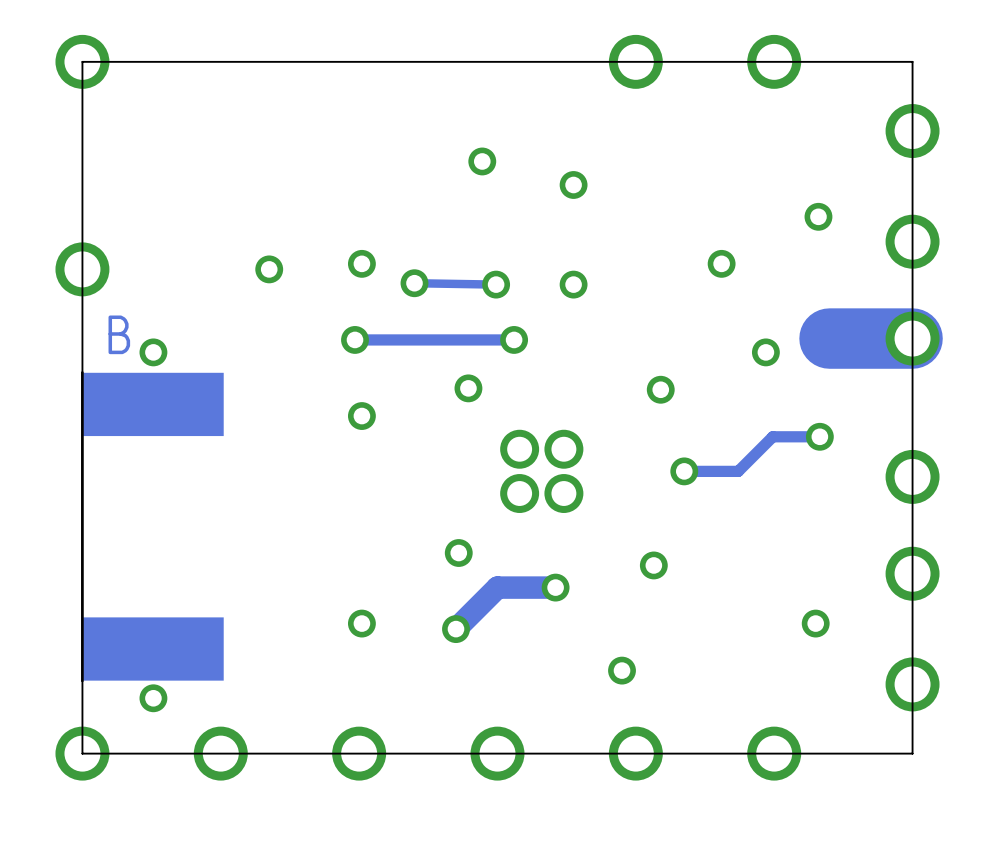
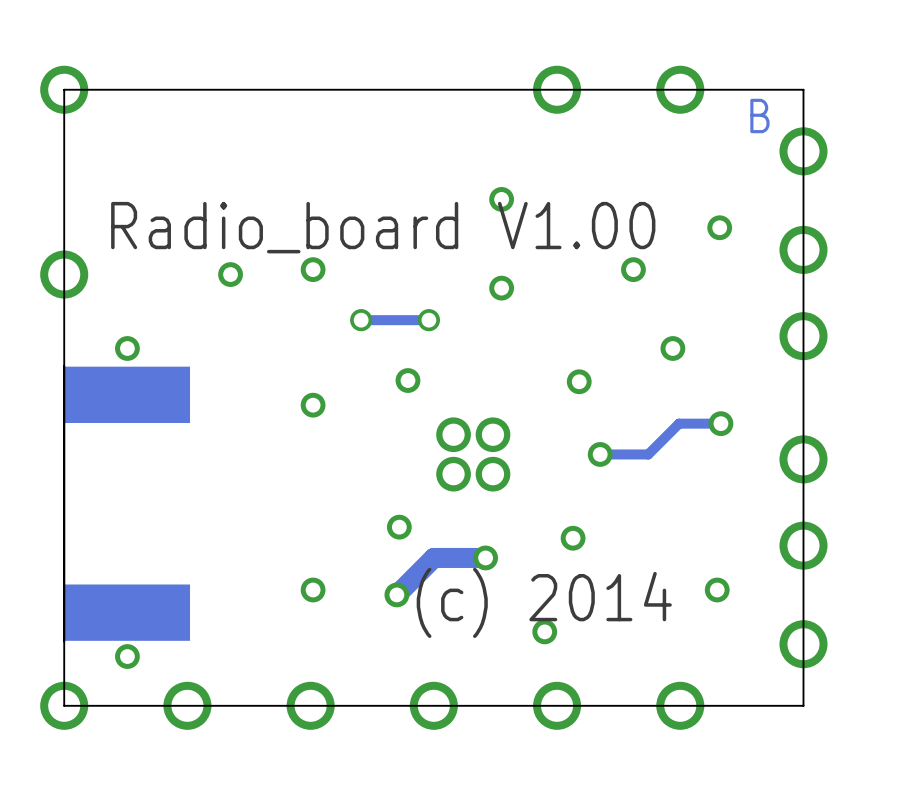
text: none -> B (759, 115)
via: (482, 161) -> none
text: none -> Radio_board V1.00 (383, 227)
track: (414, 283) (496, 284) -> none
via: (414, 283) -> none
via: (496, 284) -> none
via: none -> (361, 320)
track: none -> (428, 320) (361, 320)
via: none -> (428, 320)
text: B (119, 334) -> none
track: (912, 338) (829, 338) -> none
via: (355, 339) -> none
track: (514, 339) (355, 339) -> none
via: (514, 339) -> none
text: none -> (c) 2014 (544, 602)

